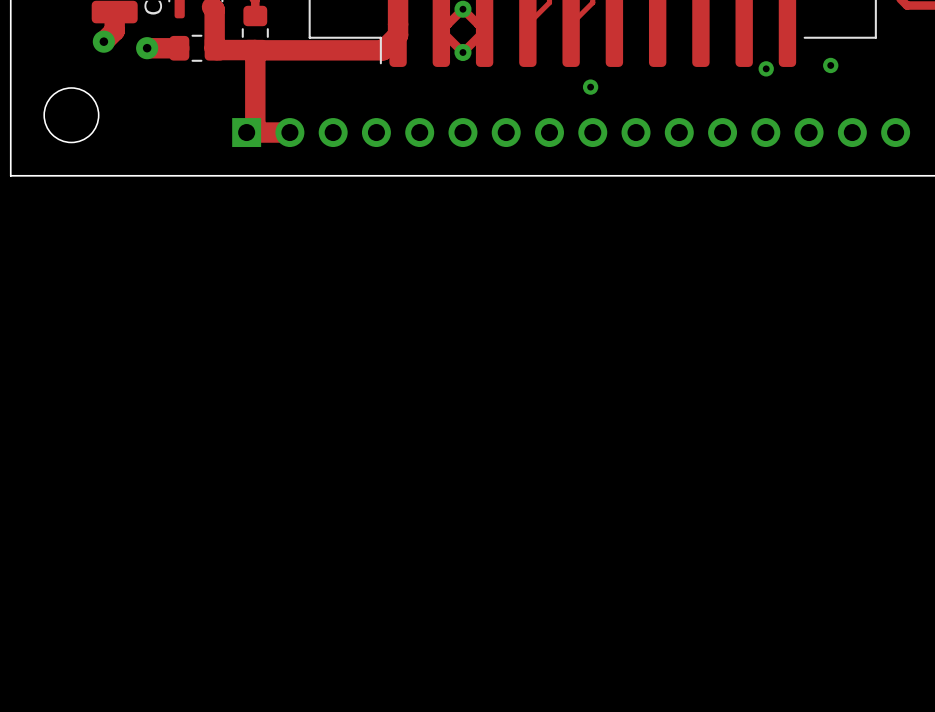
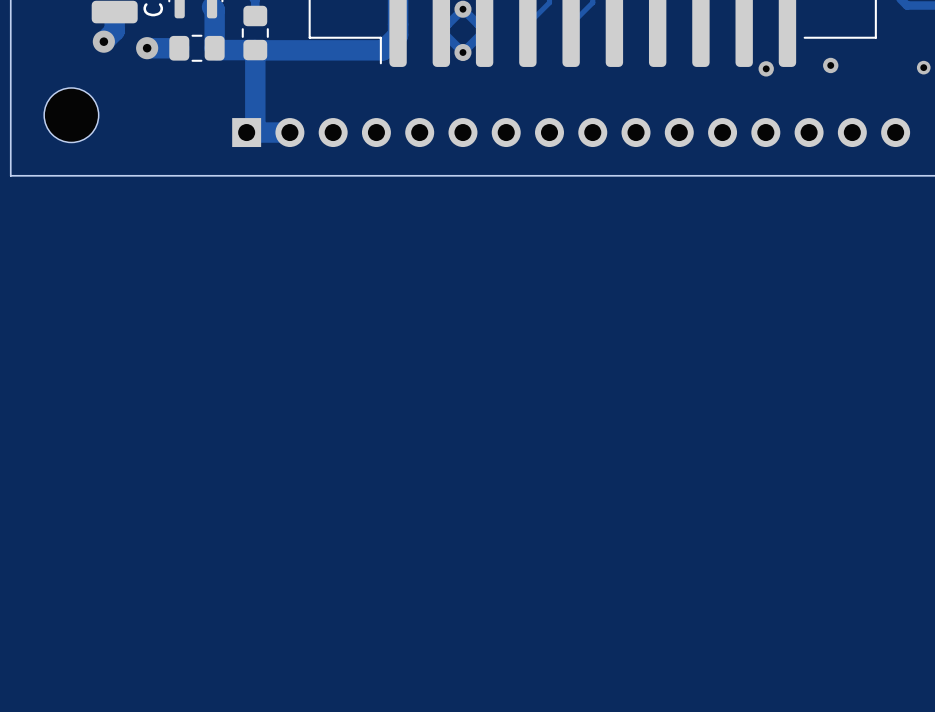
via: none -> (923, 67)
via: (590, 87) -> none

